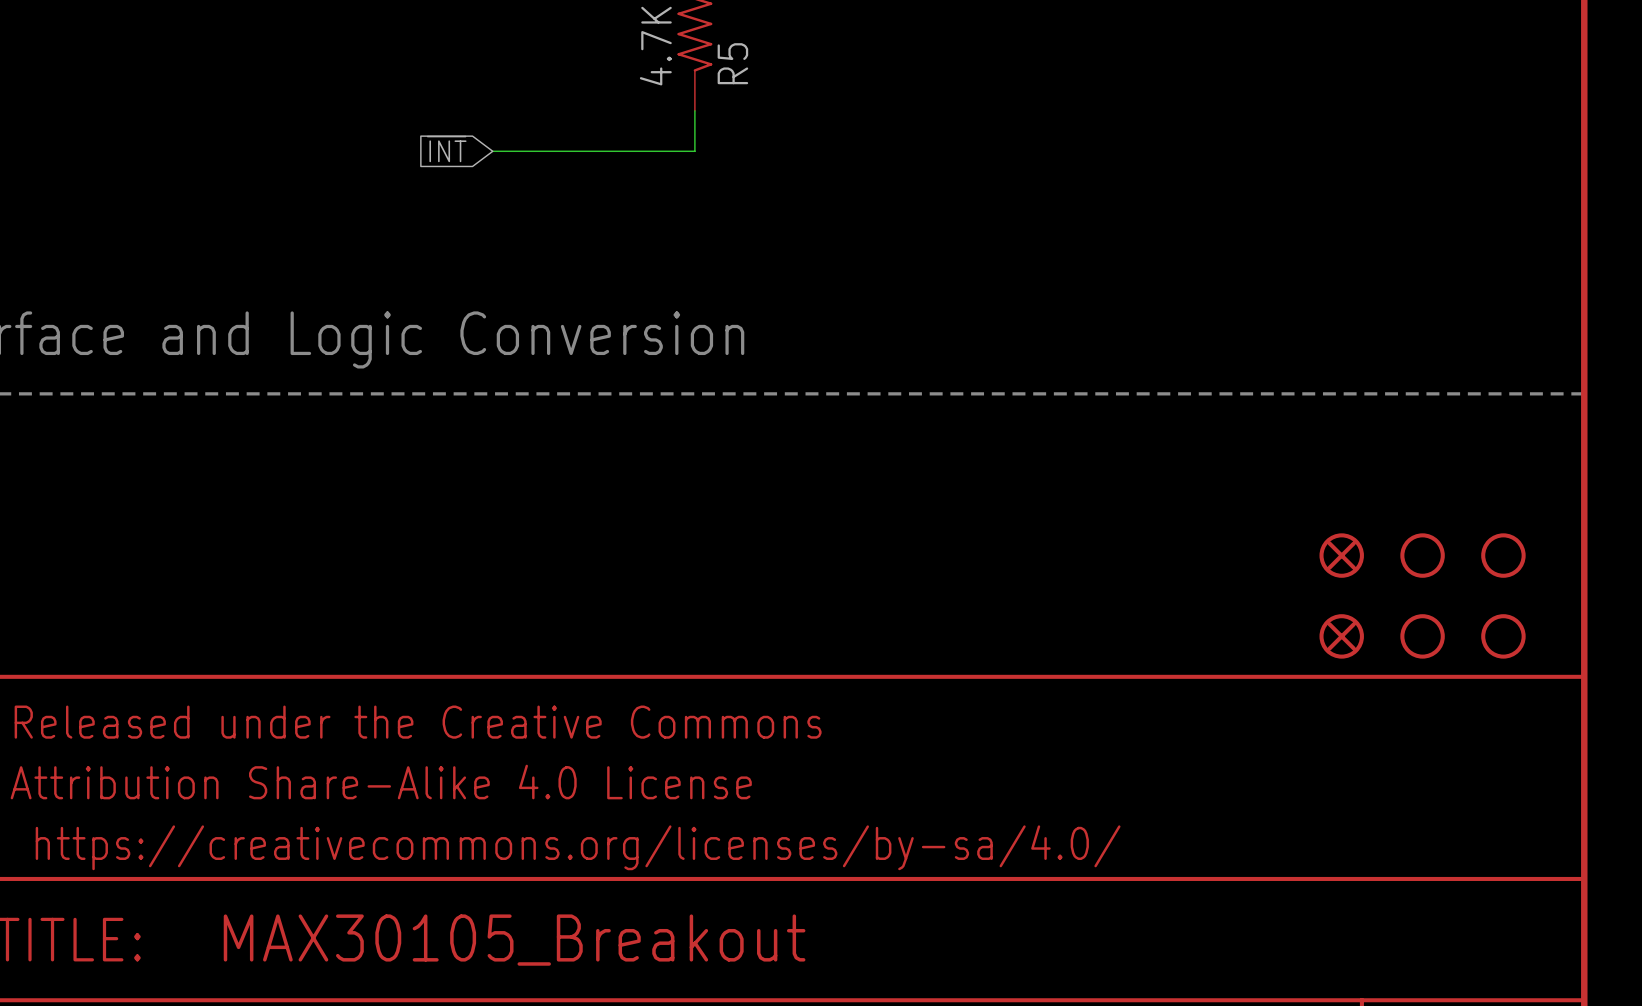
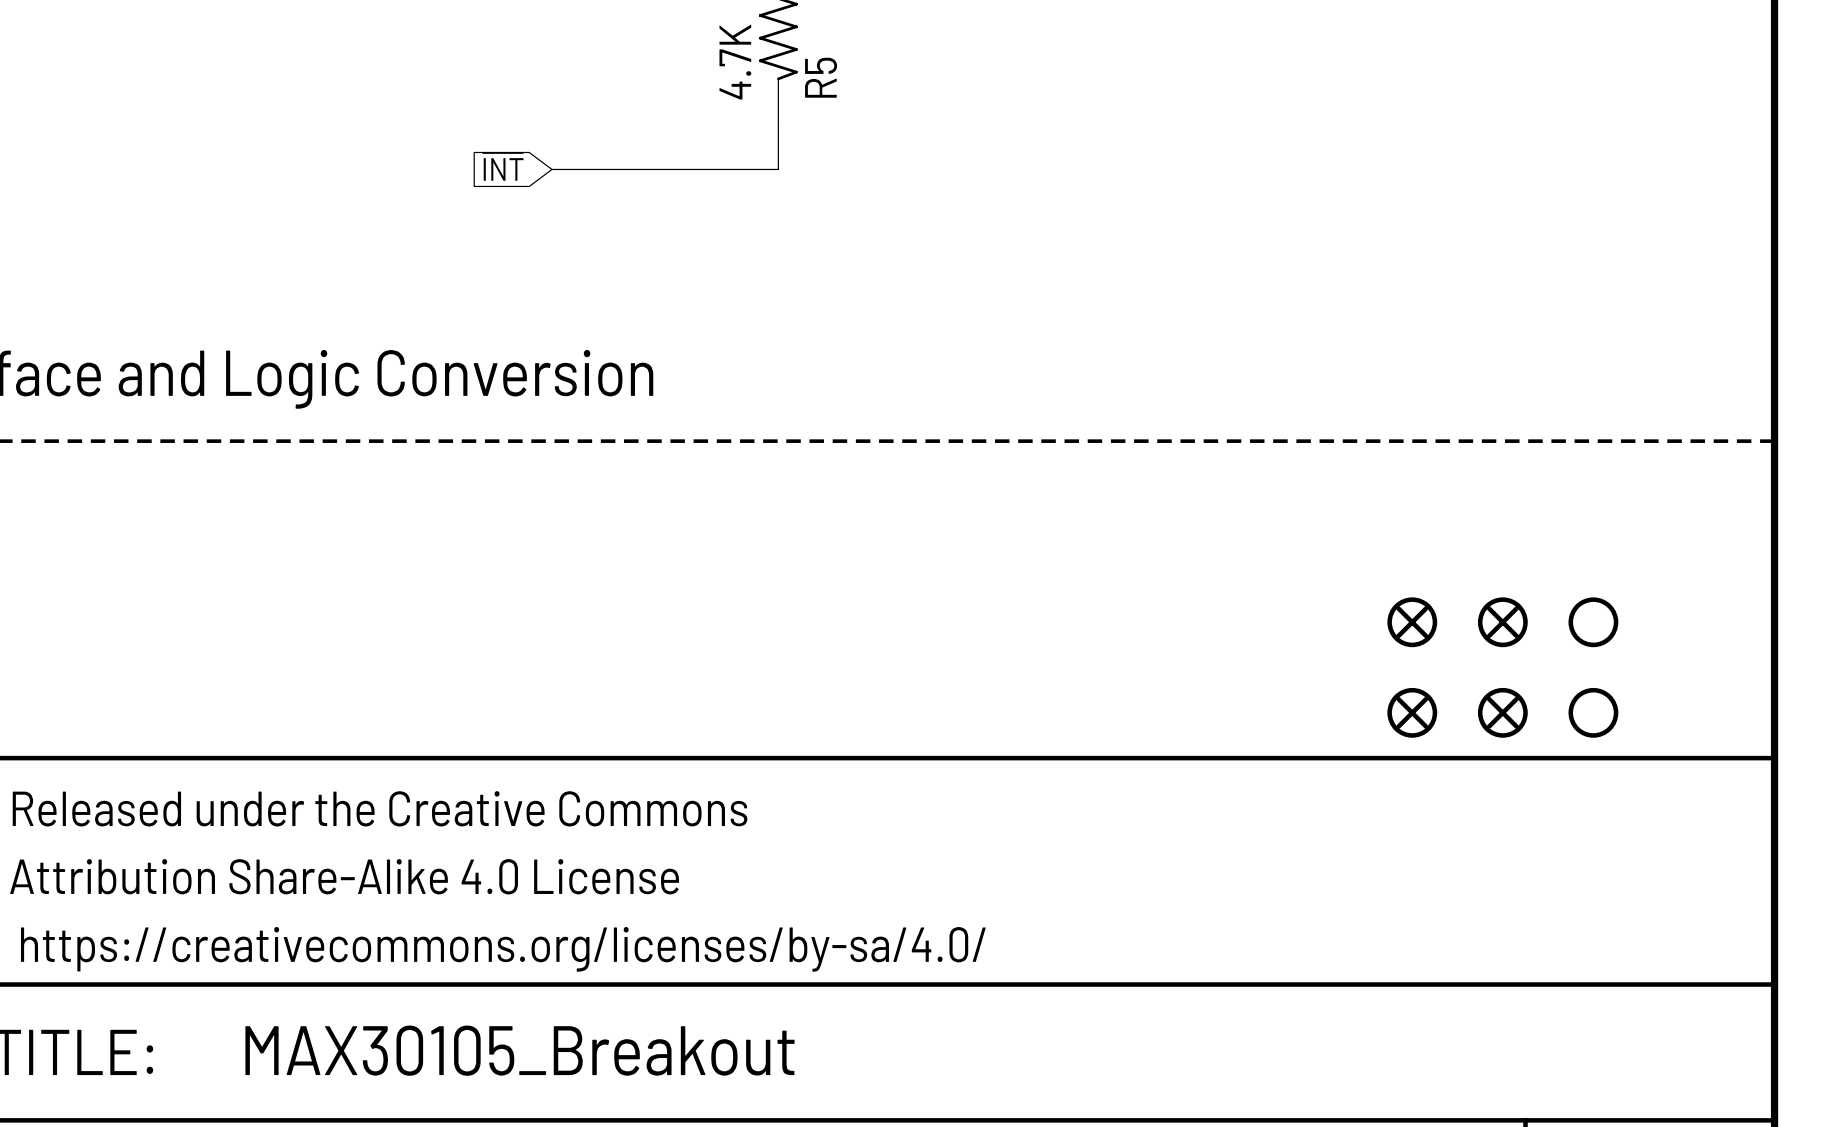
part: none -> (1412, 622)
part: (1503, 555) -> none
part: none -> (1412, 712)
part: (1503, 636) -> none

